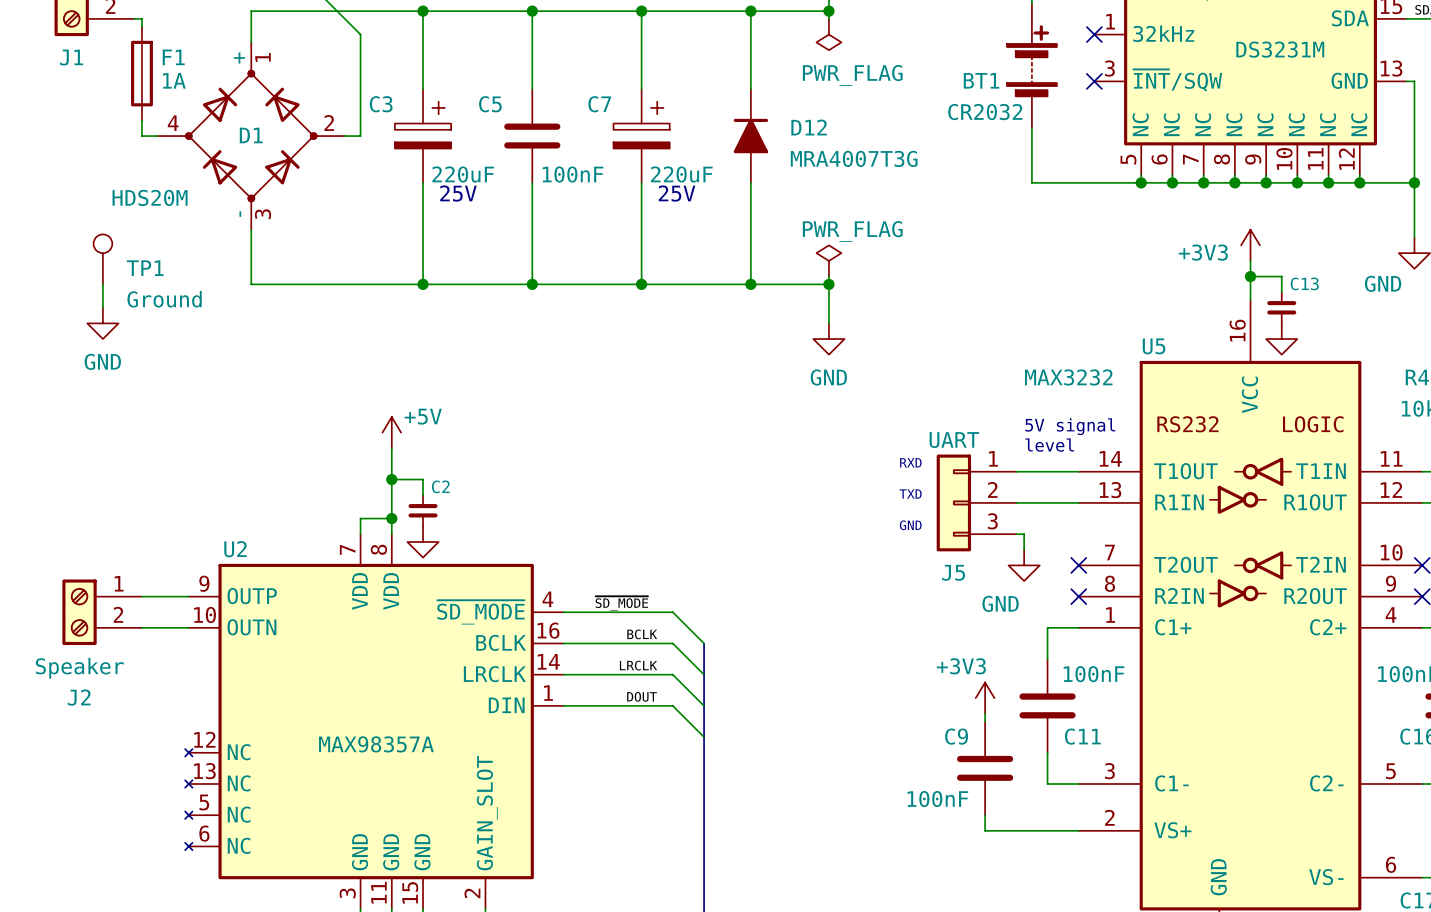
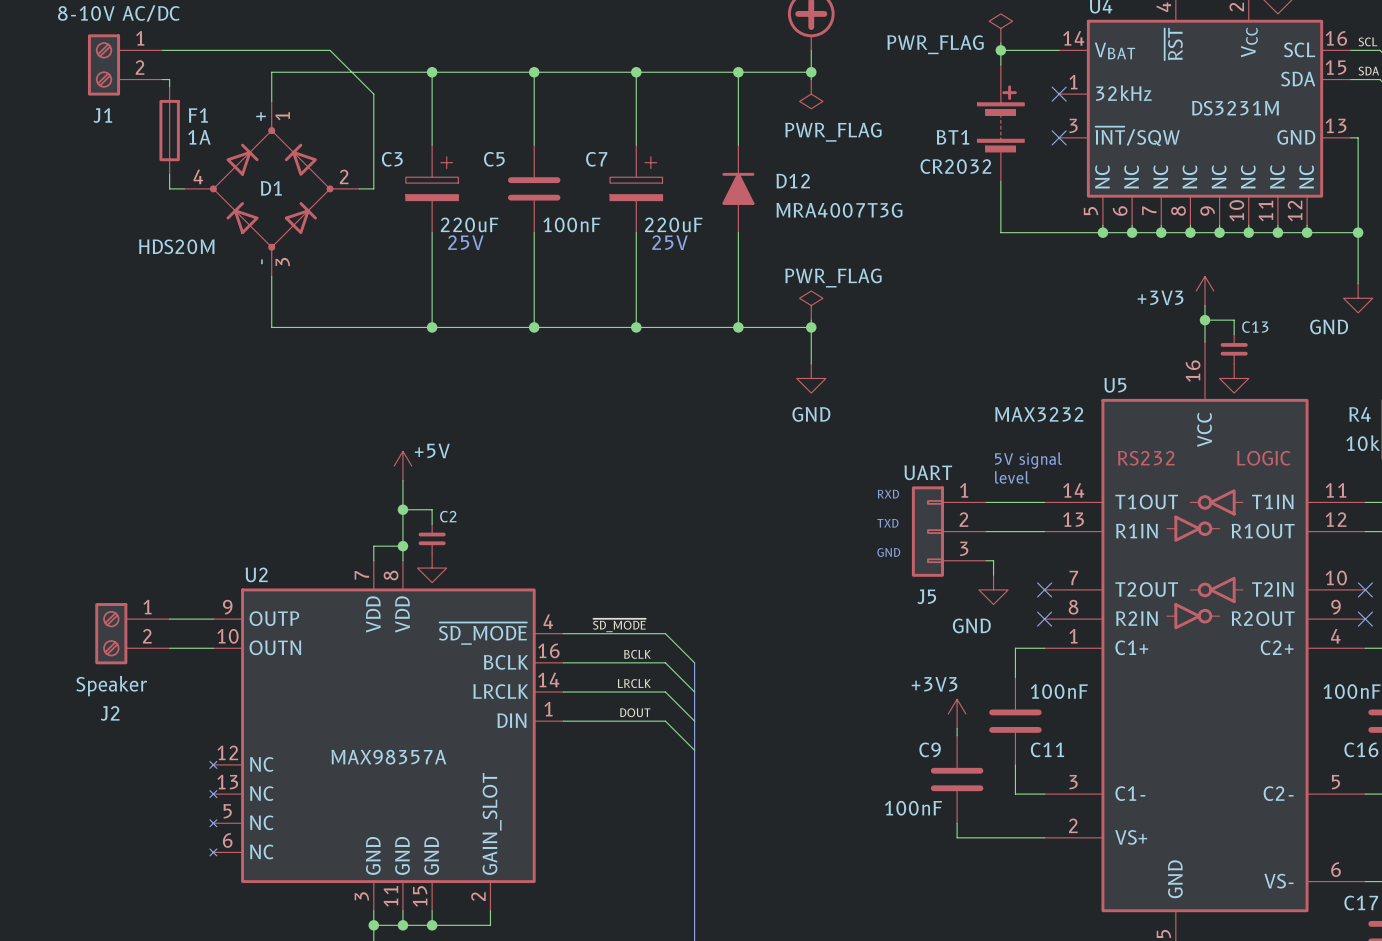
TP1: Ground (102, 259) -> none
wire: (102, 284) (102, 307) -> none
power symbol: GND (102, 323) -> none

